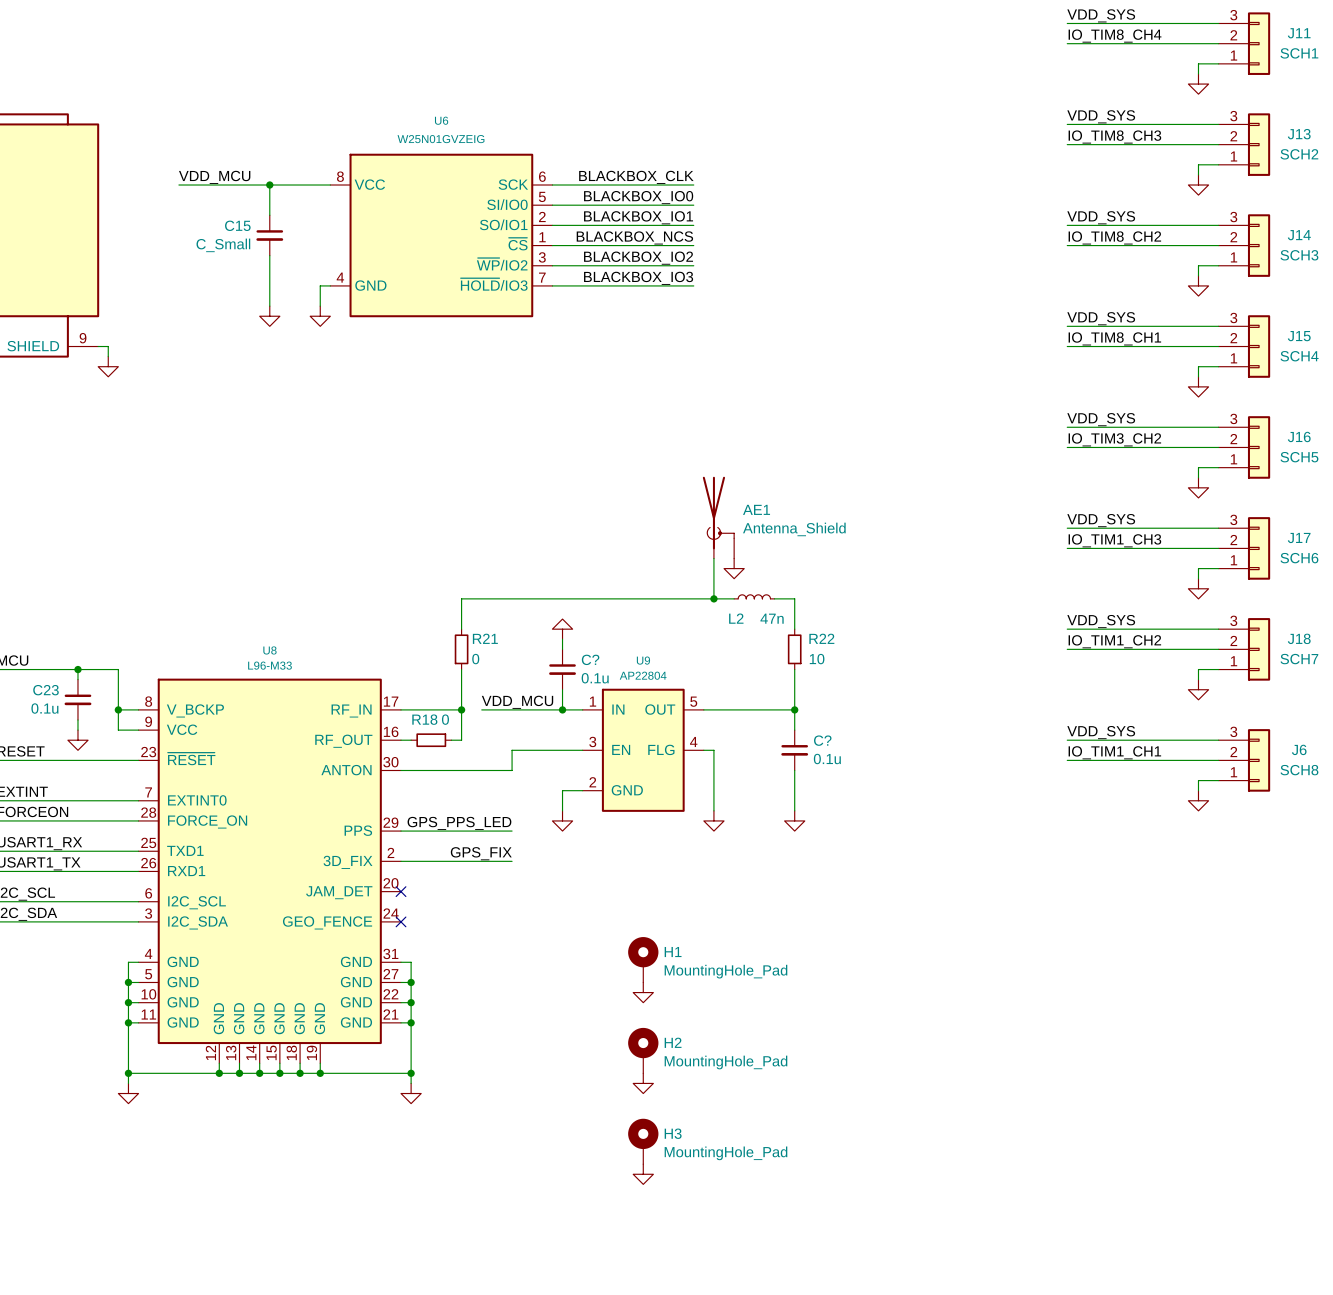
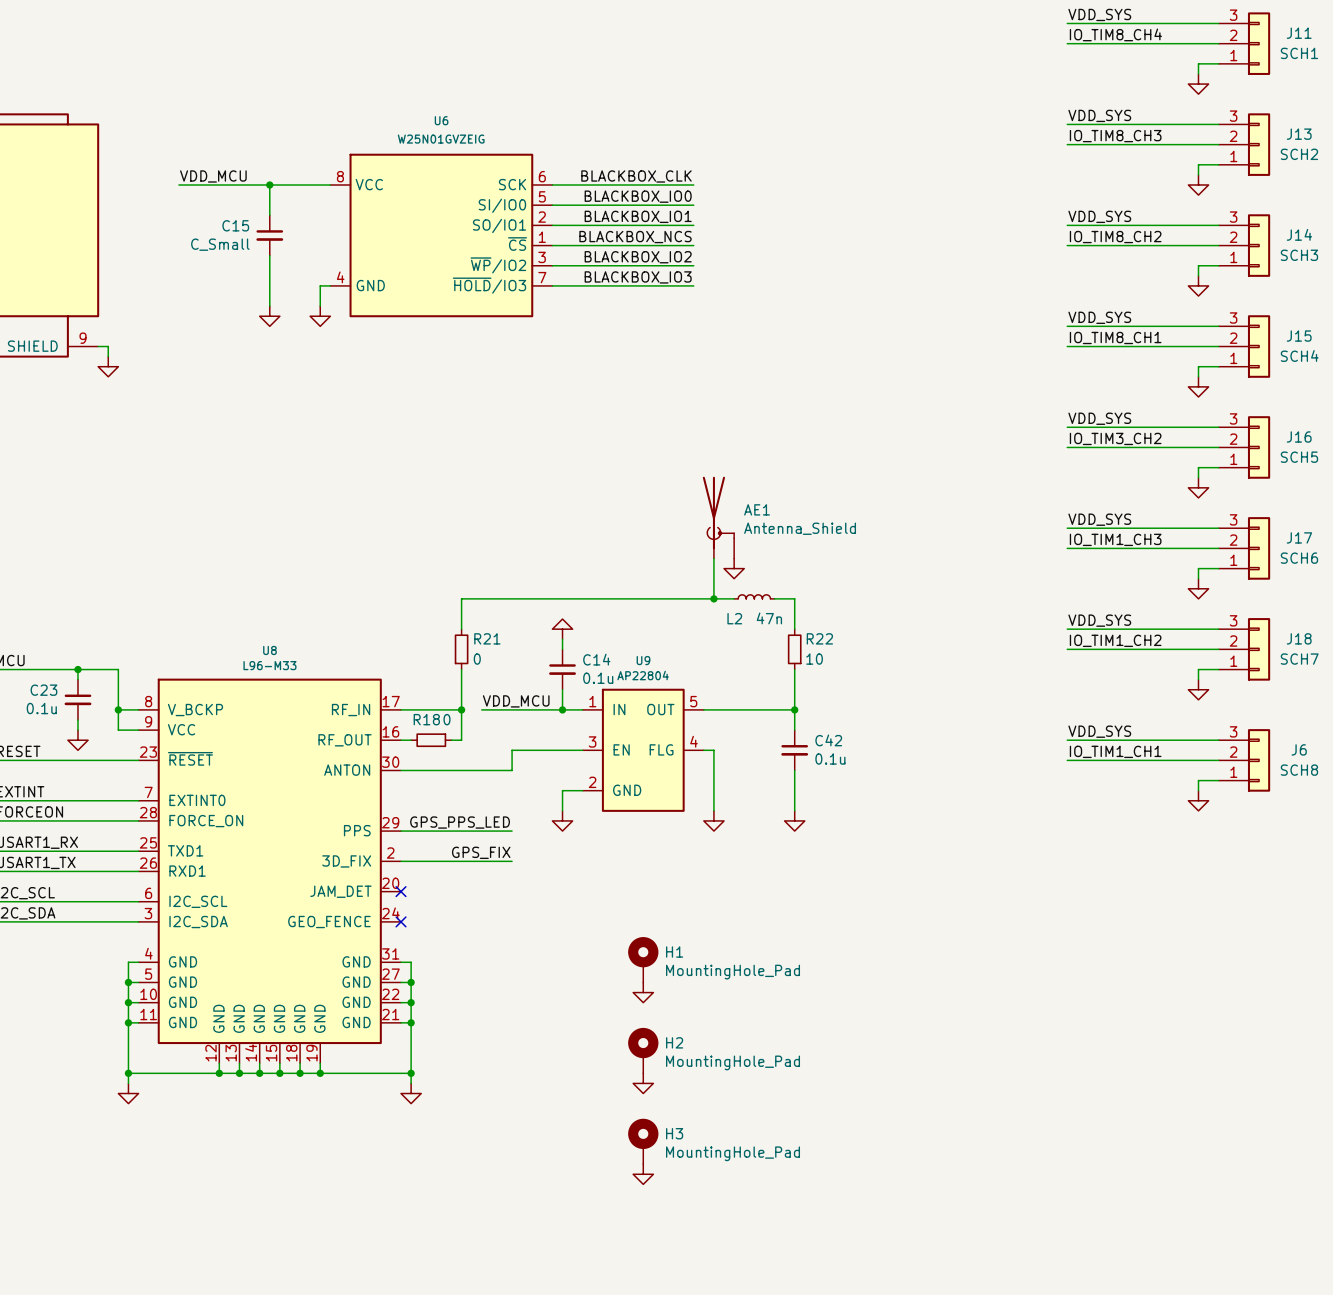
C? name: C? (590, 659) -> C14 (596, 659)
C? name: C? (822, 740) -> C42 (828, 740)

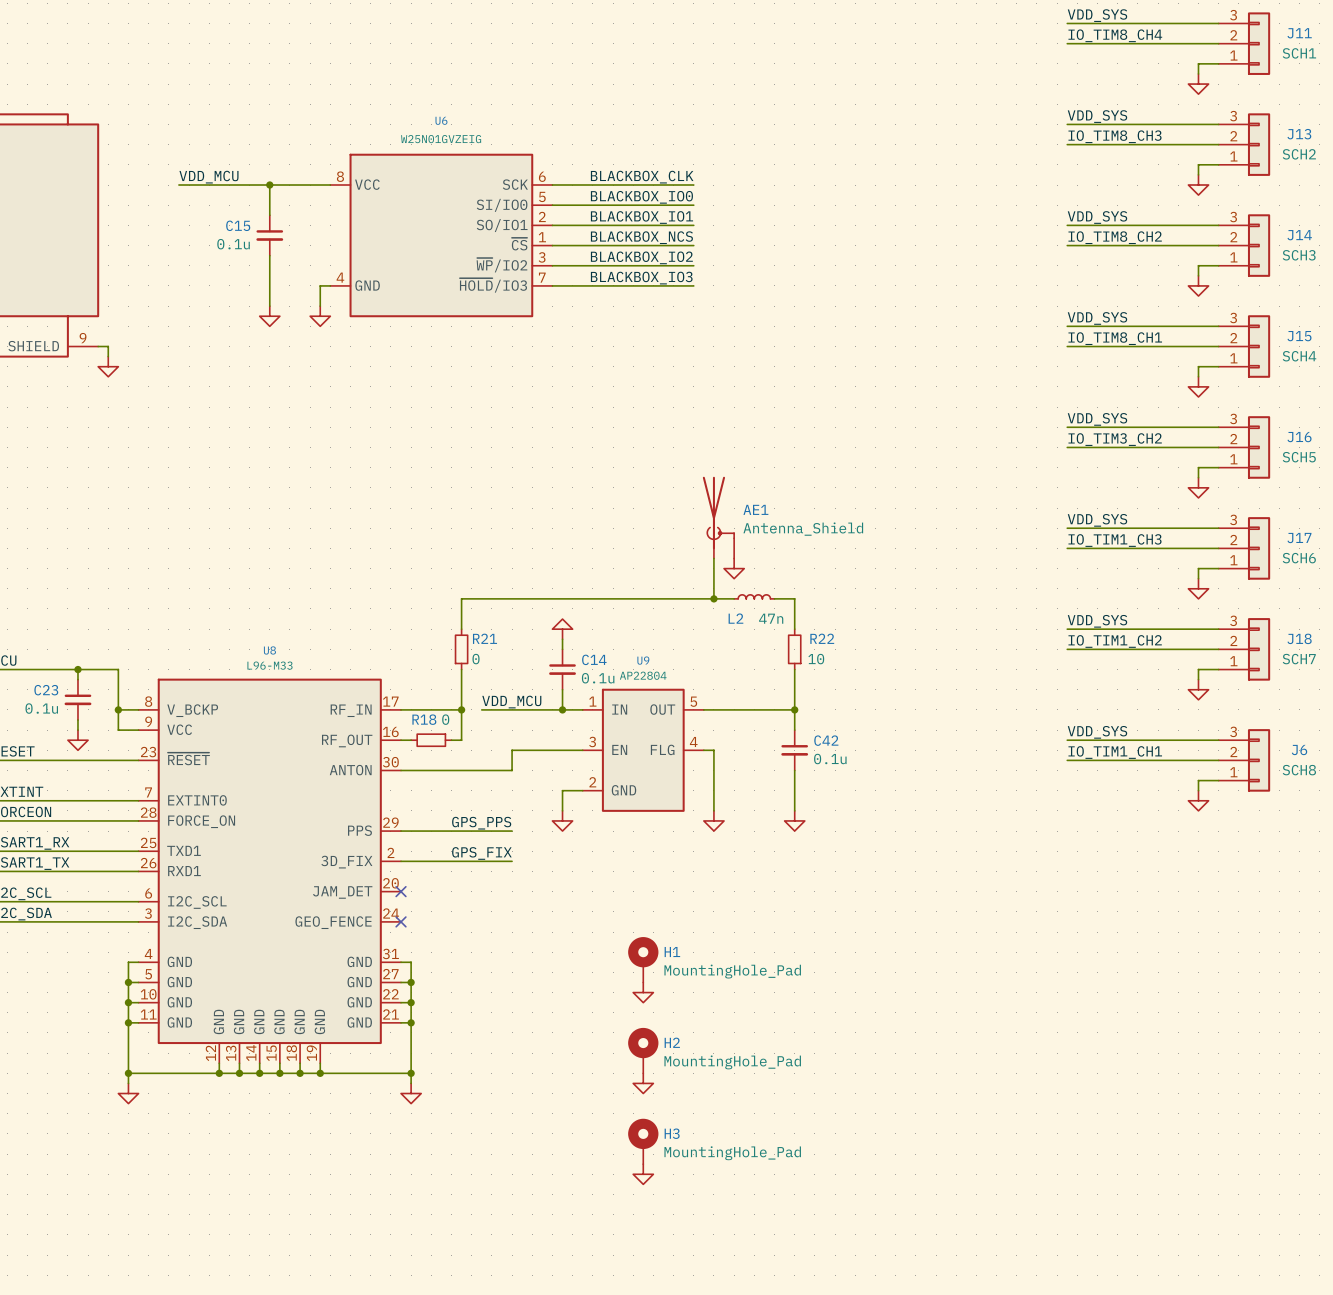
C15 value: C_Small (220, 244) -> 0.1u (233, 244)
label: GPS_PPS_LED (460, 822) -> GPS_PPS (481, 823)

